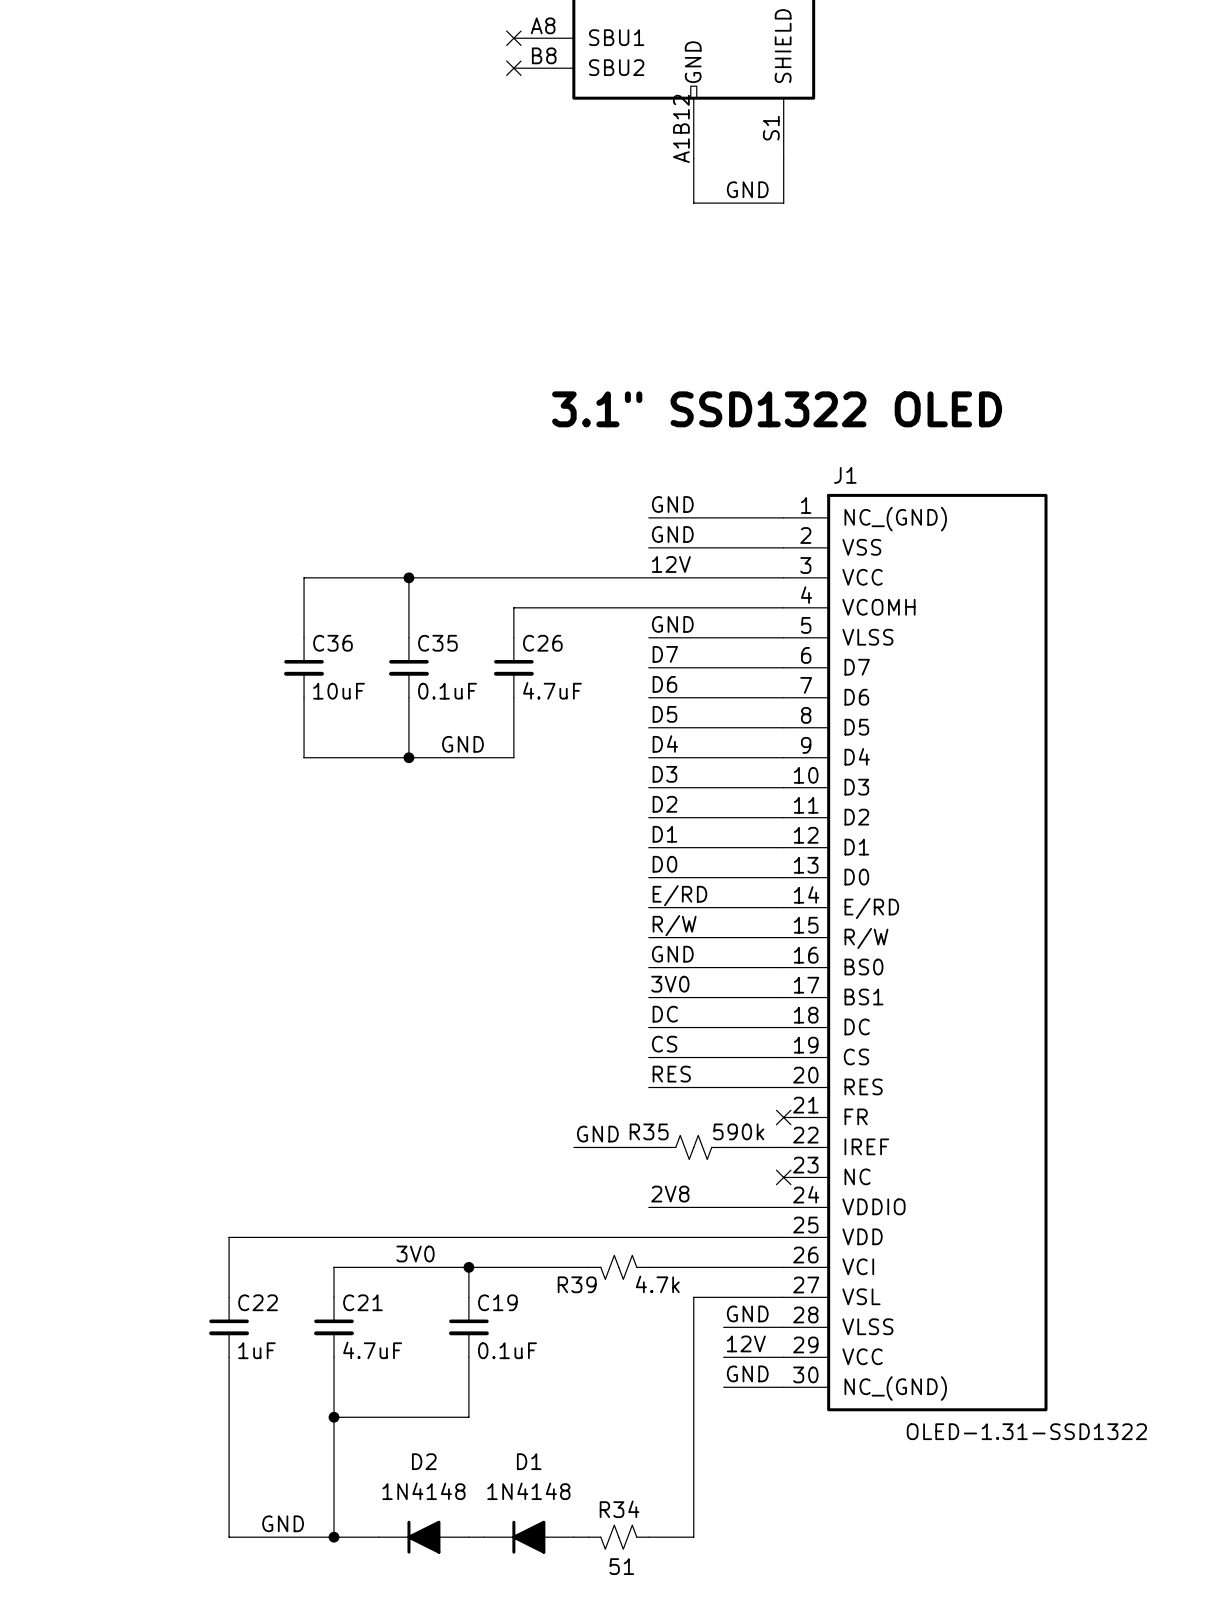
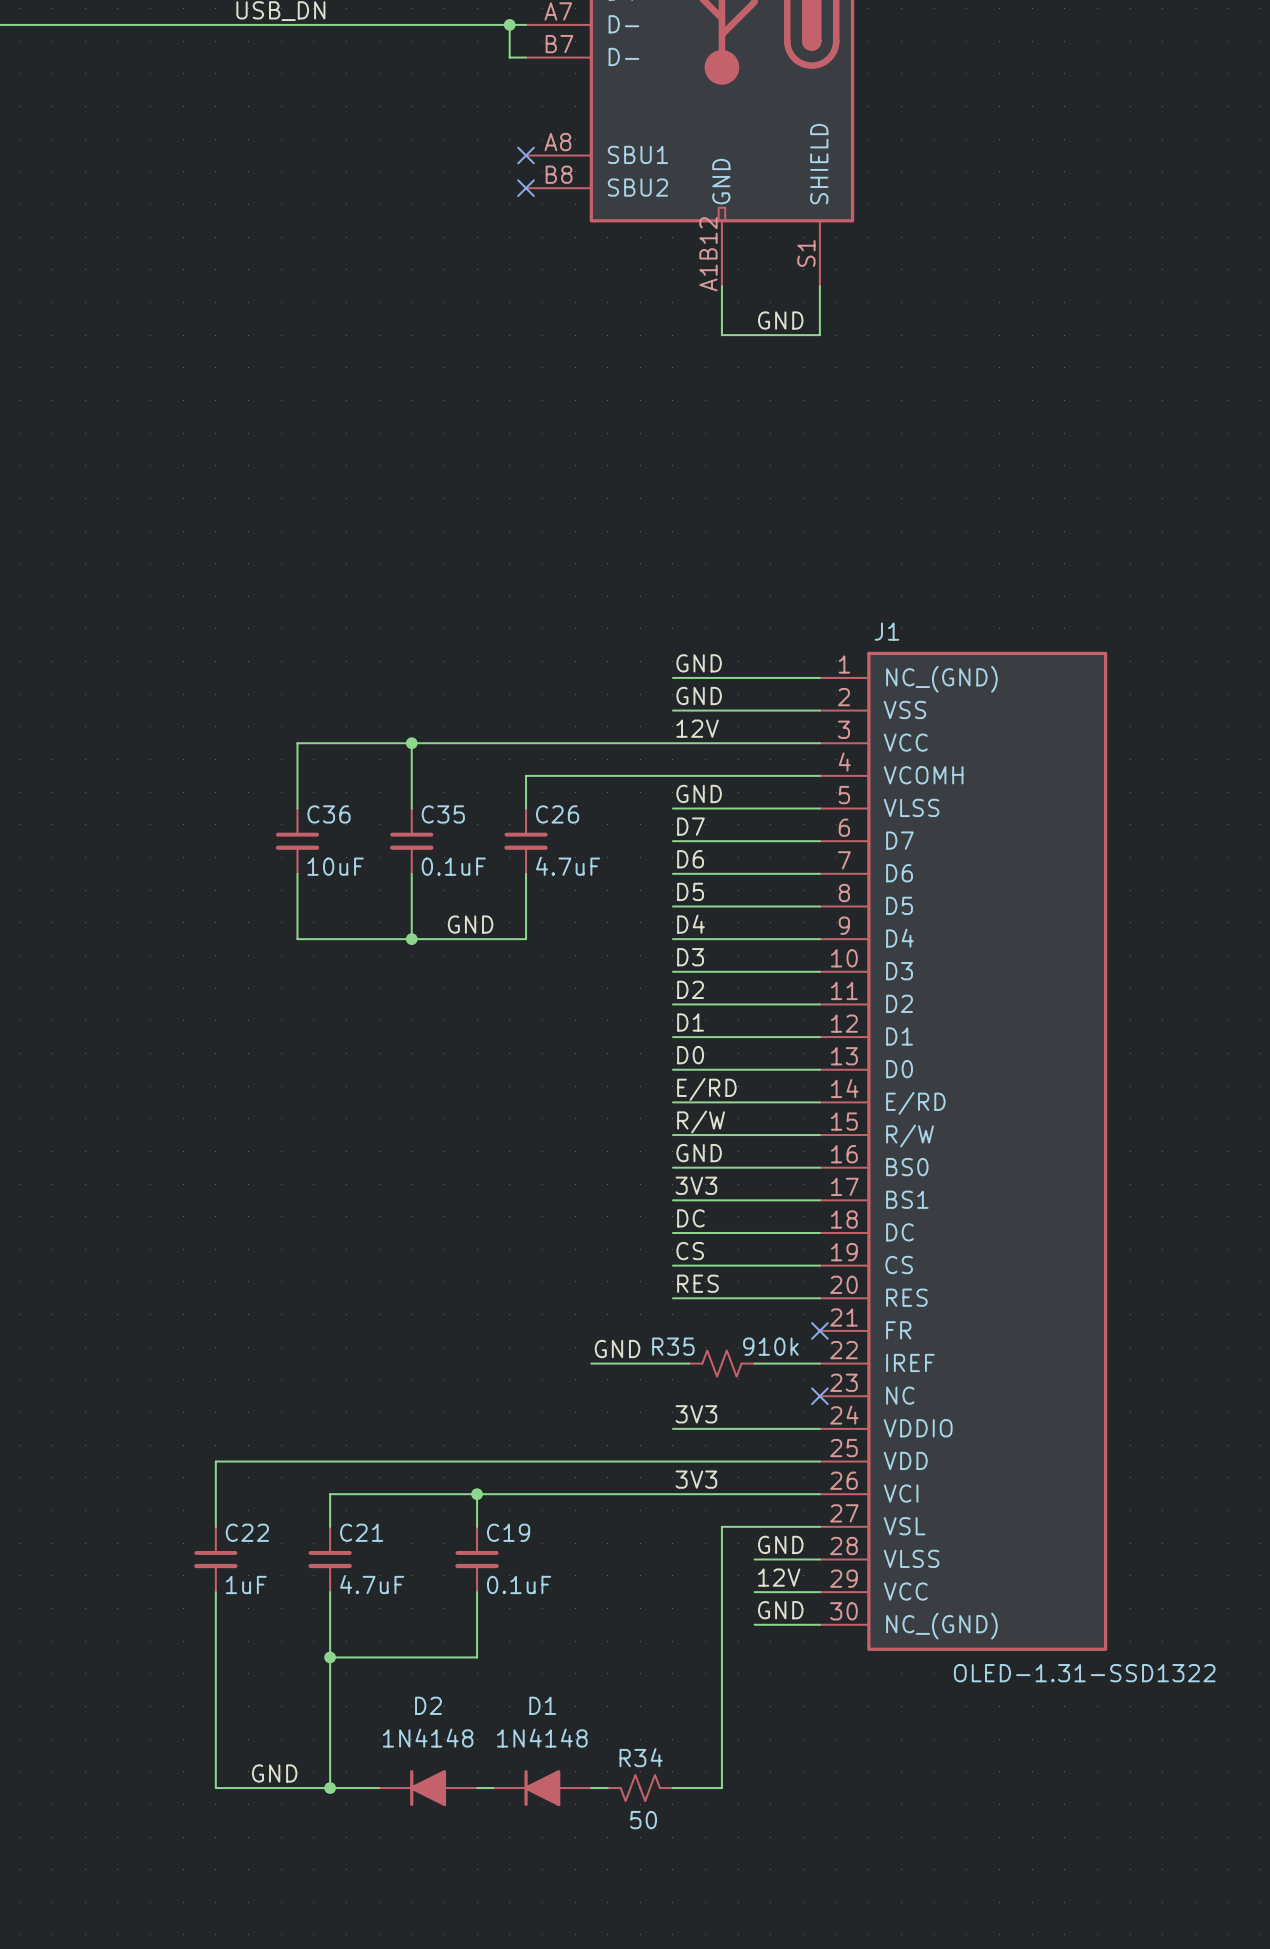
text: 3.1" SSD1322 OLED (777, 409) -> none
label: 3V0 (670, 984) -> 3V3 (696, 1185)
R35 value: 590k (738, 1131) -> 910k (770, 1346)
label: 2V8 (670, 1194) -> 3V3 (696, 1414)
label: 3V0 (415, 1253) -> none
label: none -> 3V3 (696, 1479)
R39: 4.7k (618, 1267) -> none
R34 value: 51 (621, 1566) -> 50 (643, 1820)

